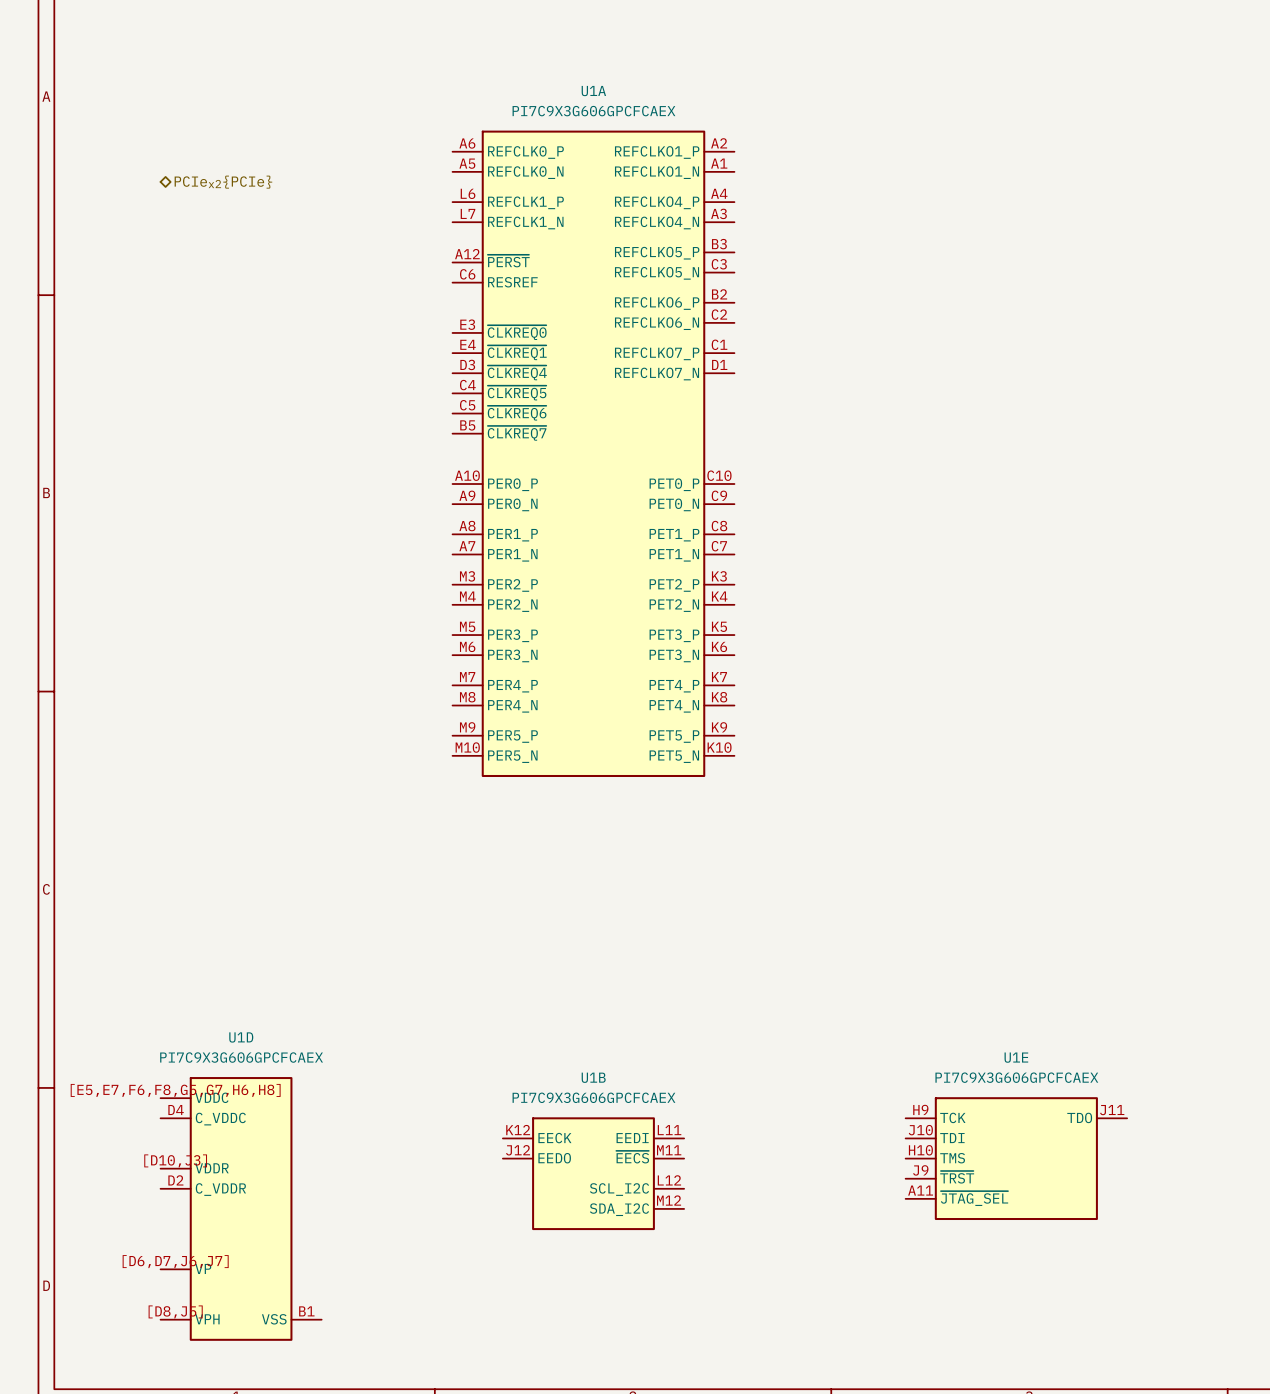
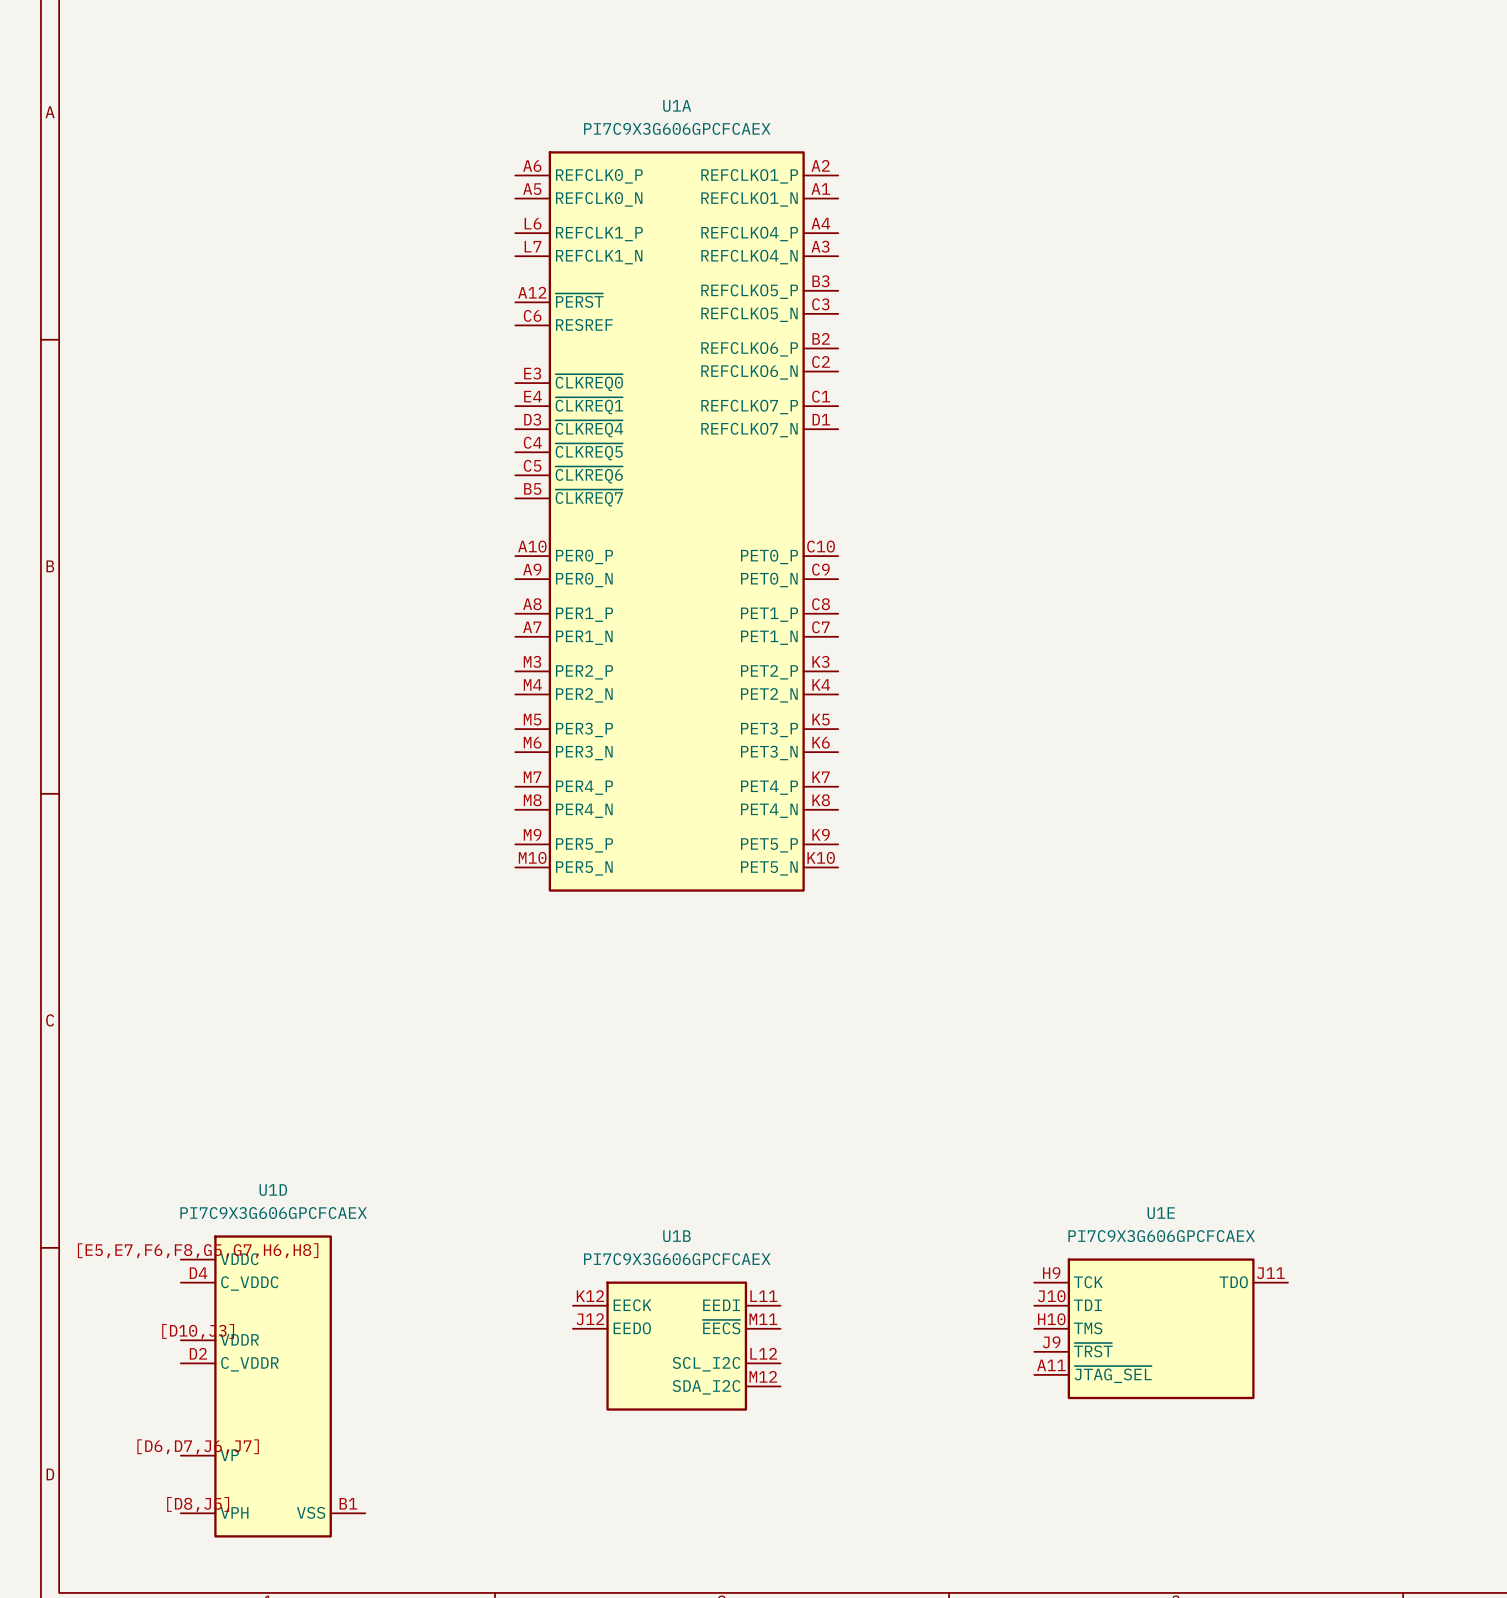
hierarchical label: PCIex2{PCIe} (223, 182) -> none

